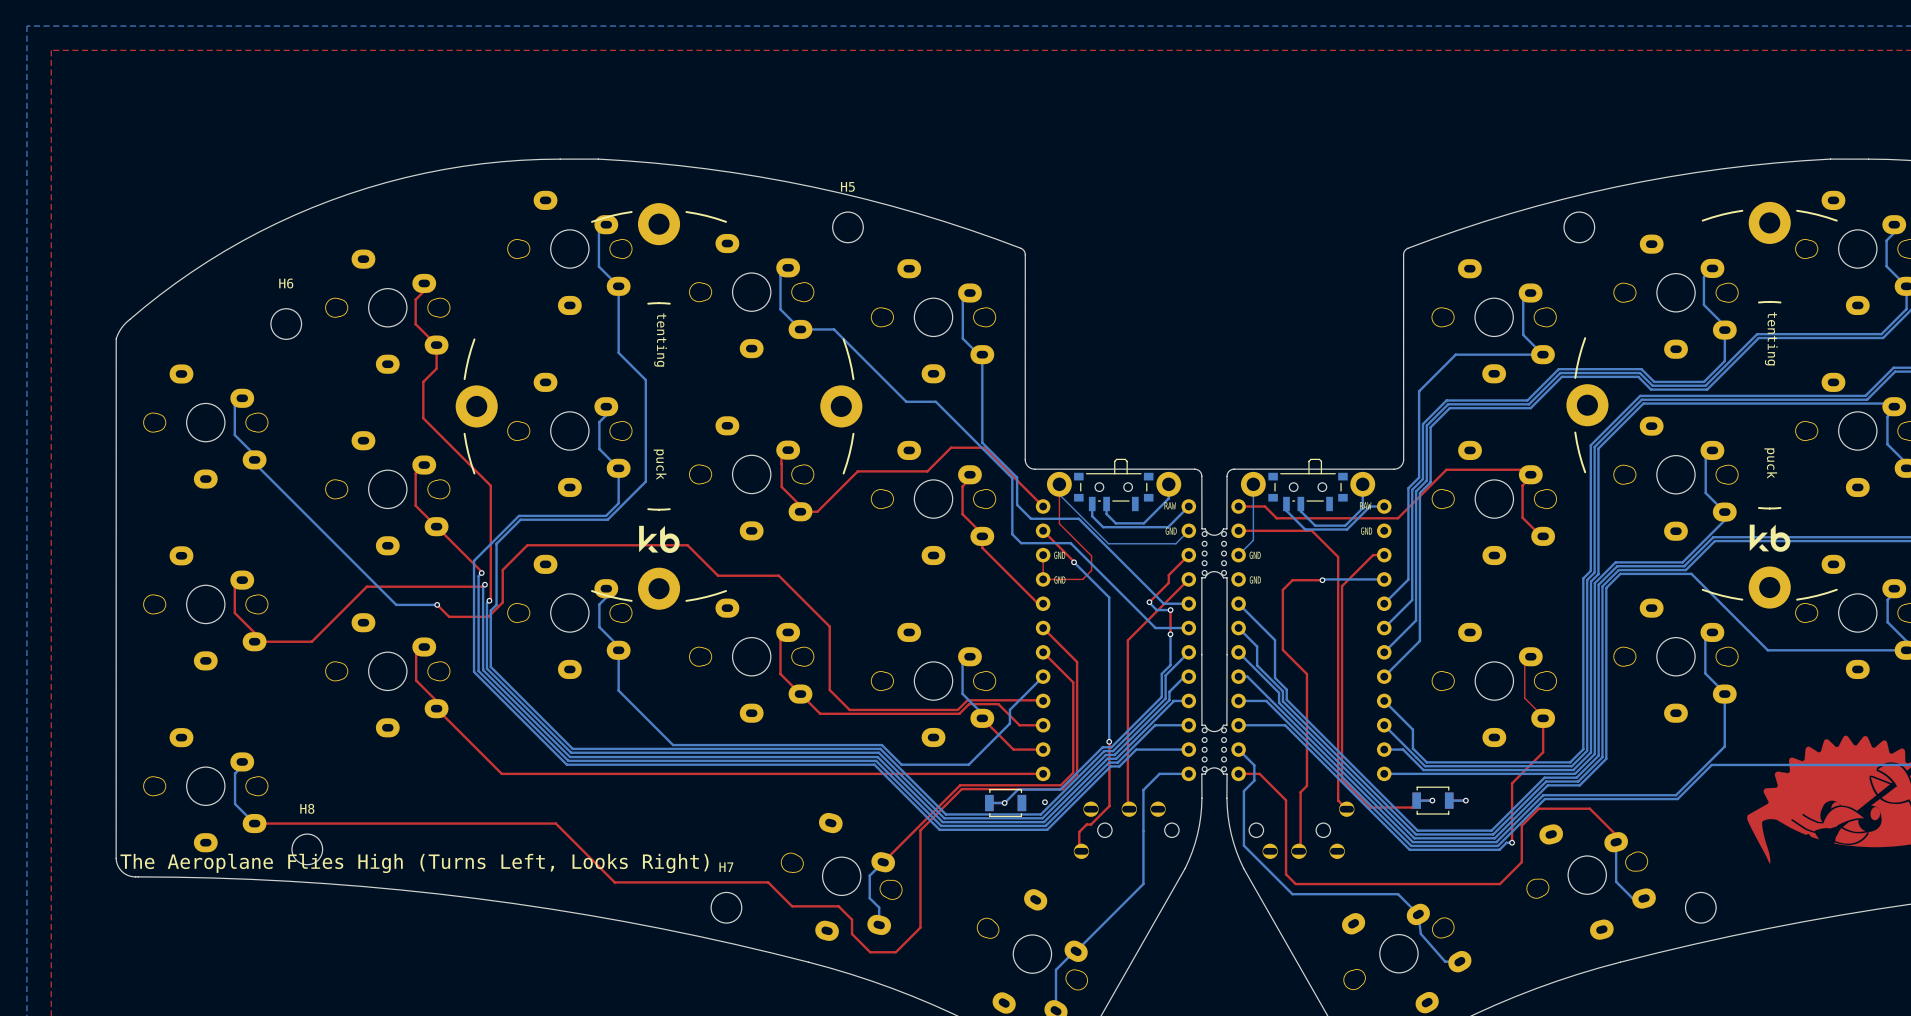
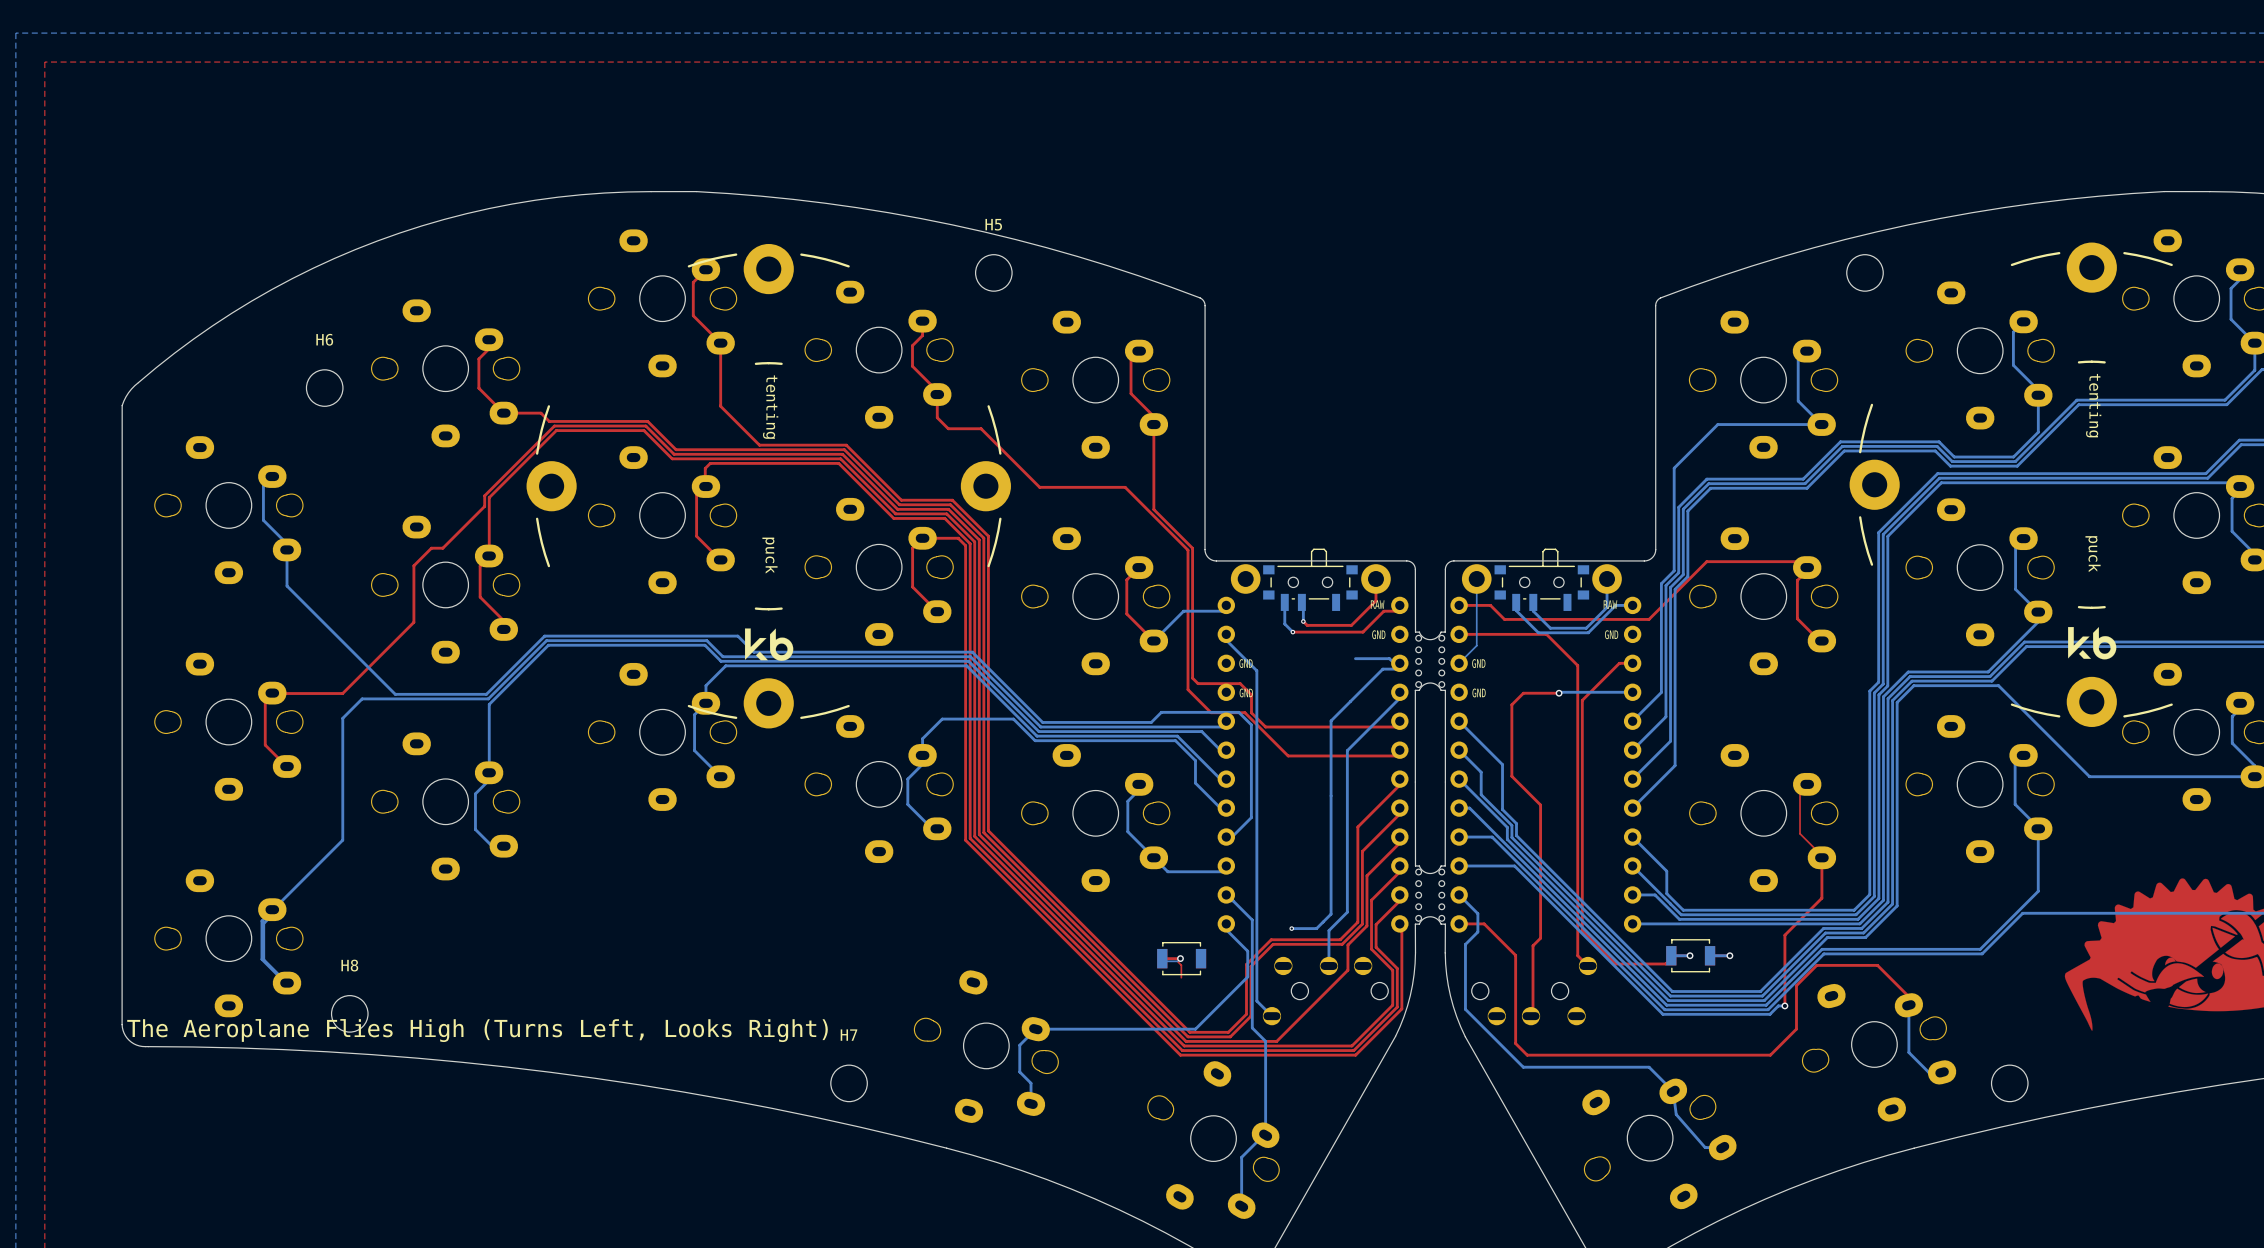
bottom track: (606, 224) (598, 232) (598, 266) (618, 286) (618, 352) (645, 380) (645, 481) (607, 519) (520, 519) (496, 543) (496, 604) (490, 610) (490, 666) (572, 748) (880, 748) (945, 814) (1040, 814) (1104, 751) (1113, 751) (1165, 698) (1165, 675) (1188, 652) -> none
top track: none -> (705, 269) (693, 282) (693, 315) (720, 343) (720, 406) (759, 445) (846, 445) (901, 500) (952, 500) (988, 536) (988, 830) (1189, 1032) (1228, 1032) (1246, 1014) (1246, 964) (1271, 939) (1340, 939) (1357, 922) (1357, 827) (1399, 784)
bottom track: (788, 267) (780, 275) (780, 309) (800, 329) (834, 329) (906, 401) (935, 401) (1012, 478) (1012, 534) (1021, 543) (1070, 543) (1155, 628) (1188, 628) -> none
top track: none -> (922, 321) (922, 335) (912, 345) (912, 366) (937, 391) (937, 417) (948, 428) (981, 428) (1039, 487) (1125, 487) (1188, 550) (1188, 689) (1211, 712) (1244, 712) (1288, 755) (1399, 755)
bottom track: (969, 293) (962, 300) (962, 338) (978, 354) (982, 354) (982, 442) (1017, 477) (1017, 504) (1030, 518) (1078, 518) (1163, 603) (1188, 603) -> none
top track: none -> (1139, 351) (1131, 359) (1131, 393) (1153, 416) (1153, 509) (1192, 548) (1192, 678) (1198, 683) (1240, 683) (1251, 694) (1251, 712) (1265, 727) (1399, 727)
top track: (436, 345) (436, 368) (423, 381) (423, 418) (490, 485) (489, 600) -> (503, 413) (541, 413) (549, 421) (647, 421) (676, 449) (844, 449) (899, 504) (950, 504) (983, 538) (983, 832) (1188, 1036) (1230, 1036) (1251, 1016) (1251, 966) (1273, 944) (1342, 944) (1362, 924) (1362, 851) (1399, 813)
bottom track: (606, 406) (606, 415) (599, 422) (599, 449) (618, 468) (618, 503) (606, 515) (519, 515) (474, 560) (474, 671) (566, 764) (874, 764) (939, 829) (1047, 829) (1110, 766) (1119, 766) (1136, 749) (1188, 749) -> none
top track: none -> (958, 538) (922, 538)
top track: none -> (958, 538) (965, 545) (965, 840) (1180, 1055) (1355, 1055) (1401, 1008) (1401, 931) (1399, 929)
top track: (781, 456) (781, 486) (800, 505) (800, 511) (817, 511) (857, 471) (927, 471) (951, 447) (984, 447) (1043, 506) -> (914, 546) (912, 548) (912, 587) (937, 611)
bottom track: (254, 463) (396, 604) (437, 604) -> (287, 553) (287, 586) (395, 694) (486, 694) (544, 636) (737, 636) (753, 652) (972, 652) (1042, 722) (1151, 722) (1161, 712) (1238, 712) (1251, 724) (1251, 817) (1226, 842)
top track: (424, 465) (415, 473) (415, 505) (481, 573) -> none
top track: none -> (719, 559) (696, 536) (696, 494) (705, 486) (705, 468) (710, 463) (838, 463) (893, 518) (944, 518) (970, 543) (970, 838) (1182, 1050) (1353, 1050) (1397, 1007) (1397, 968) (1376, 947) (1376, 924) (1399, 900)
top track: (969, 474) (969, 479) (962, 486) (962, 514) (982, 533) (982, 547) (1038, 603) (1043, 603) -> (1139, 567) (1126, 579) (1126, 613) (1153, 641)
bottom track: (1059, 484) (1059, 494) (1108, 543) (1175, 543) (1188, 530) -> none
top track: (1059, 484) (1059, 523) (1091, 555) (1091, 570) (1082, 579) (1043, 579) (1043, 555) -> none
bottom track: (1168, 484) (1168, 498) (1143, 523) (1115, 523) (1106, 514) (1106, 503) -> (1303, 621) (1301, 602)
top track: none -> (1375, 578) (1375, 600) (1351, 625) (1307, 625) (1303, 621)
bottom track: (1188, 506) (1168, 527) (1103, 527) (1092, 516) -> (1292, 632) (1284, 624) (1284, 617)
bottom track: none -> (1226, 611) (1183, 611) (1153, 641)
top track: none -> (1399, 611) (1383, 611) (1362, 632) (1292, 632)
via: none -> (1303, 621)
top track: none -> (503, 630) (503, 620) (480, 597) (480, 565) (489, 556) (489, 497) (556, 430) (643, 430) (672, 458) (840, 458) (895, 513) (946, 513) (974, 541) (974, 836) (1184, 1046) (1351, 1046) (1392, 1005) (1392, 970) (1371, 949) (1371, 900) (1399, 871)
via: none -> (1292, 632)
top track: (1043, 530) (1074, 562) -> none
bottom track: none -> (1226, 640) (1256, 670) (1256, 1001) (1271, 1016)
bottom track: none -> (1355, 658) (1389, 658) (1399, 669) (1382, 669) (1331, 720) (1331, 914) (1316, 928) (1291, 928)
top track: (1188, 555) (1168, 575) (1168, 582) (1149, 602) -> none
bottom track: (1074, 562) (1109, 597) (1109, 741) -> none
via: (1074, 562) -> none
bottom track: (481, 573) (478, 576) (478, 671) (568, 760) (876, 760) (941, 825) (1045, 825) (1109, 762) (1117, 762) (1155, 725) (1188, 725) -> none
via: (481, 573) -> none
top track: (1188, 579) (1127, 640) (1129, 809) -> none
top track: (242, 580) (234, 587) (234, 613) (254, 632) (254, 641) (311, 641) (366, 586) (482, 586) (484, 584) -> none
bottom track: (484, 584) (483, 586) (483, 670) (570, 757) (877, 757) (942, 822) (1044, 822) (1107, 758) (1116, 758) (1173, 700) (1188, 700) -> none
via: (484, 584) -> none
bottom track: none -> (1399, 698) (1347, 750) (1347, 912) (1328, 930) (1328, 965)
bottom track: (606, 588) (606, 597) (599, 604) (599, 627) (618, 646) (618, 690) (673, 745) (881, 745) (901, 764) (968, 764) (1009, 723) (1009, 709) (1043, 676) -> none
bottom track: (489, 600) (486, 603) (486, 668) (571, 752) (878, 752) (944, 818) (1042, 818) (1105, 754) (1114, 754) (1169, 700) (1169, 691) (1184, 676) (1188, 676) -> none
via: (489, 600) -> none
bottom track: (1149, 602) (1156, 610) (1170, 610) -> none
via: (1149, 602) -> none
top track: (437, 604) (449, 616) (488, 616) (502, 602) (502, 569) (527, 545) (687, 545) (718, 575) (778, 575) (829, 626) (829, 690) (849, 709) (957, 709) (967, 700) (1043, 700) -> none
via: (437, 604) -> none
bottom track: none -> (1226, 727) (1040, 727) (970, 656) (722, 656) (706, 640) (546, 640) (488, 698) (362, 698) (342, 718) (342, 840) (261, 920) (261, 959) (286, 984)
top track: (1170, 610) (1170, 634) -> none
via: (1170, 610) -> none
top track: (1043, 628) (1077, 661) (1077, 774) (1062, 789) (961, 789) (920, 830) (920, 927) (895, 952) (870, 952) (852, 934) (852, 919) (838, 906) (792, 906) (768, 882) (614, 882) (555, 823) (254, 823) -> none
top track: (788, 632) (780, 640) (780, 674) (820, 713) (959, 713) (969, 704) (998, 704) (1019, 725) (1043, 725) -> none
bottom track: none -> (1226, 755) (1201, 731) (1038, 731) (968, 661) (721, 661) (704, 645) (548, 645) (489, 704) (489, 780) (475, 793) (475, 829) (493, 847) (503, 847)
bottom track: (1170, 634) (1170, 665) (1161, 673) (1161, 696) (1111, 747) (1102, 747) (1060, 789) (1018, 789) (1004, 802) (989, 802) -> (1177, 961) (1164, 961) (1162, 958)
via: (1170, 634) -> none
top track: none -> (287, 766) (265, 745) (265, 700) (272, 693) (342, 693) (413, 622) (413, 565) (431, 548) (442, 548) (484, 506) (484, 495) (554, 426) (645, 426) (674, 454) (842, 454) (897, 509) (948, 509) (979, 539) (979, 834) (1186, 1041) (1276, 1041) (1347, 970) (1347, 945) (1366, 925) (1366, 875) (1399, 842)
top track: (424, 647) (416, 655) (416, 680) (436, 700) (436, 708) (501, 773) (1043, 773) -> none
bottom track: none -> (720, 776) (694, 750) (694, 714) (705, 703) (705, 685) (725, 665) (966, 665) (1037, 736) (1177, 736) (1226, 784)
top track: (1043, 652) (1073, 682) (1073, 772) (1060, 785) (960, 785) (883, 862) -> none
bottom track: (969, 656) (962, 664) (962, 693) (982, 713) (982, 718) -> (1139, 784) (1139, 789) (1127, 801) (1127, 831) (1167, 871) (1226, 871)
bottom track: none -> (1226, 813) (1195, 783) (1195, 760) (1175, 740) (1035, 740) (1013, 719) (942, 719) (922, 738) (922, 764) (907, 779) (907, 804) (932, 828) (937, 828)
top track: (982, 718) (1013, 749) (1043, 749) -> none
top track: (1109, 741) (1109, 806) (1091, 824) (1086, 824) (1079, 831) (1079, 849) (1081, 851) -> none
via: (1109, 741) -> none
bottom track: (1188, 773) (1159, 773) (1143, 790) (1143, 883) (1076, 951) -> (1226, 900) (1232, 900) (1252, 920) (1252, 1027) (1265, 1041) (1265, 1135)
via: none -> (1291, 928)
bottom track: none -> (1226, 929) (1247, 951) (1247, 976) (1195, 1029) (1035, 1029)
via: (1044, 802) -> none
top track: none -> (1177, 961) (1181, 965) (1181, 977)

